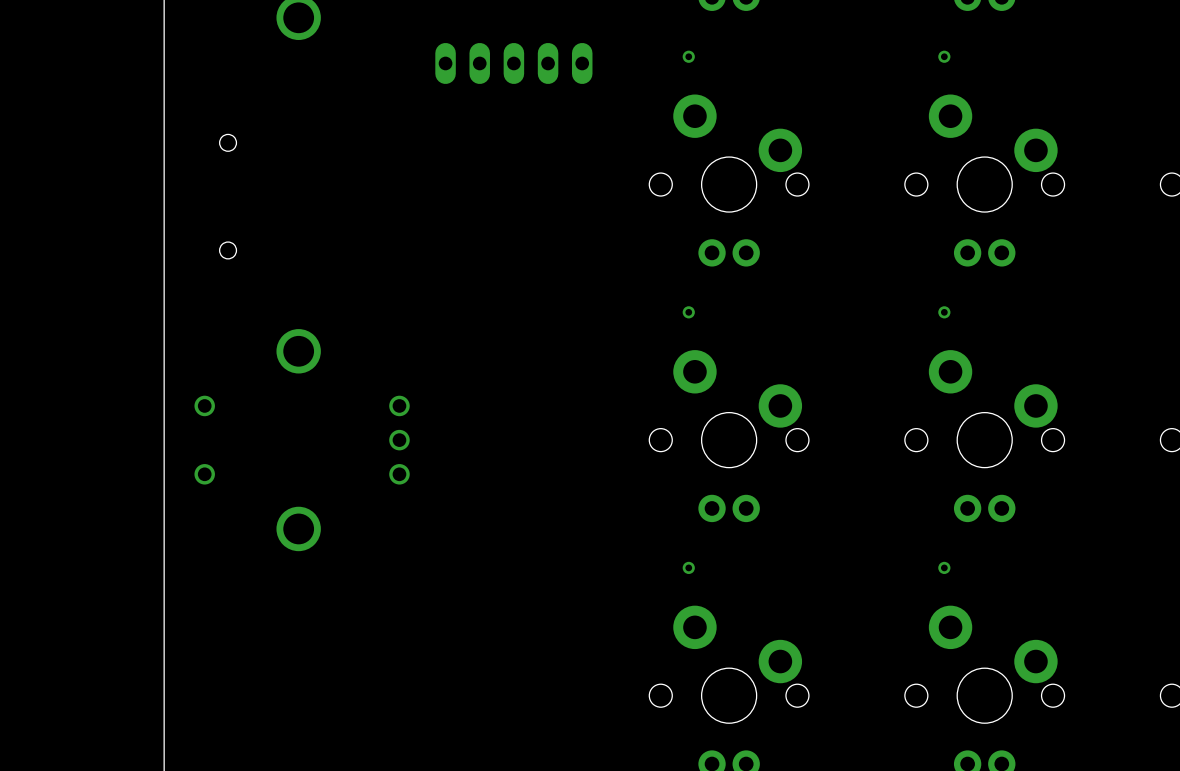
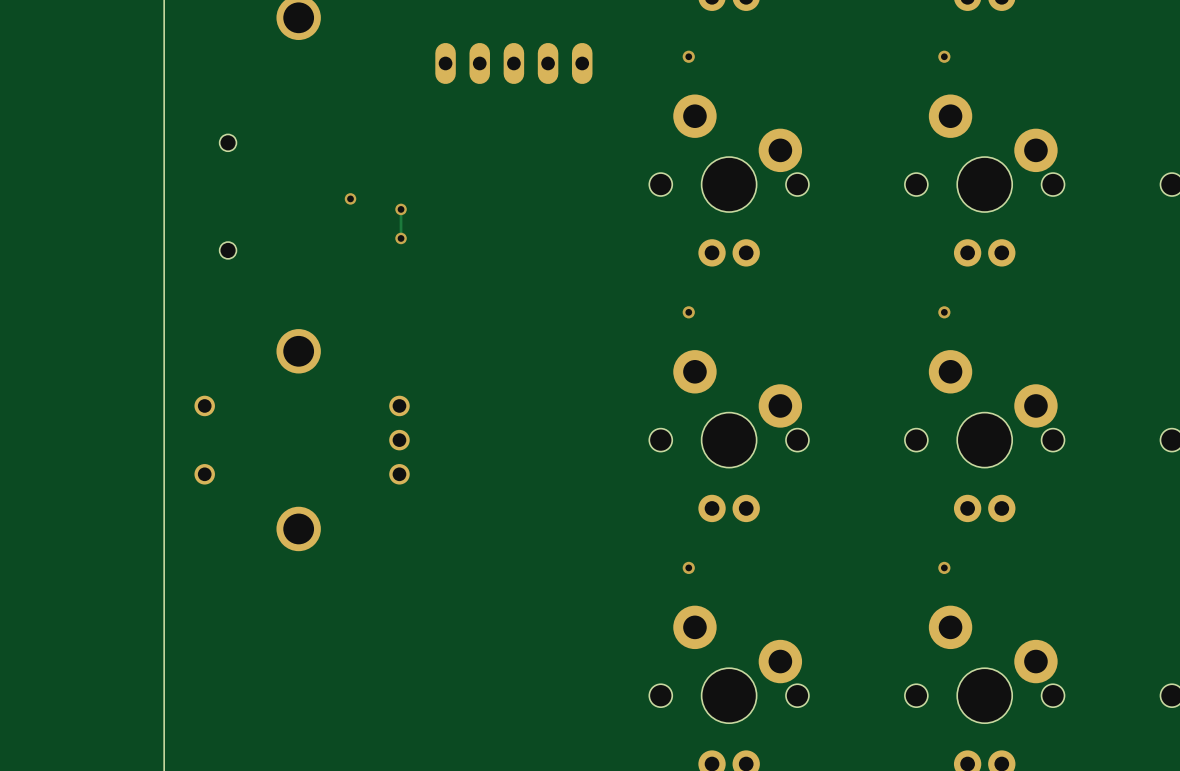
via: none -> (350, 198)
track: none -> (401, 209) (401, 238)
via: none -> (401, 209)
via: none -> (401, 238)

